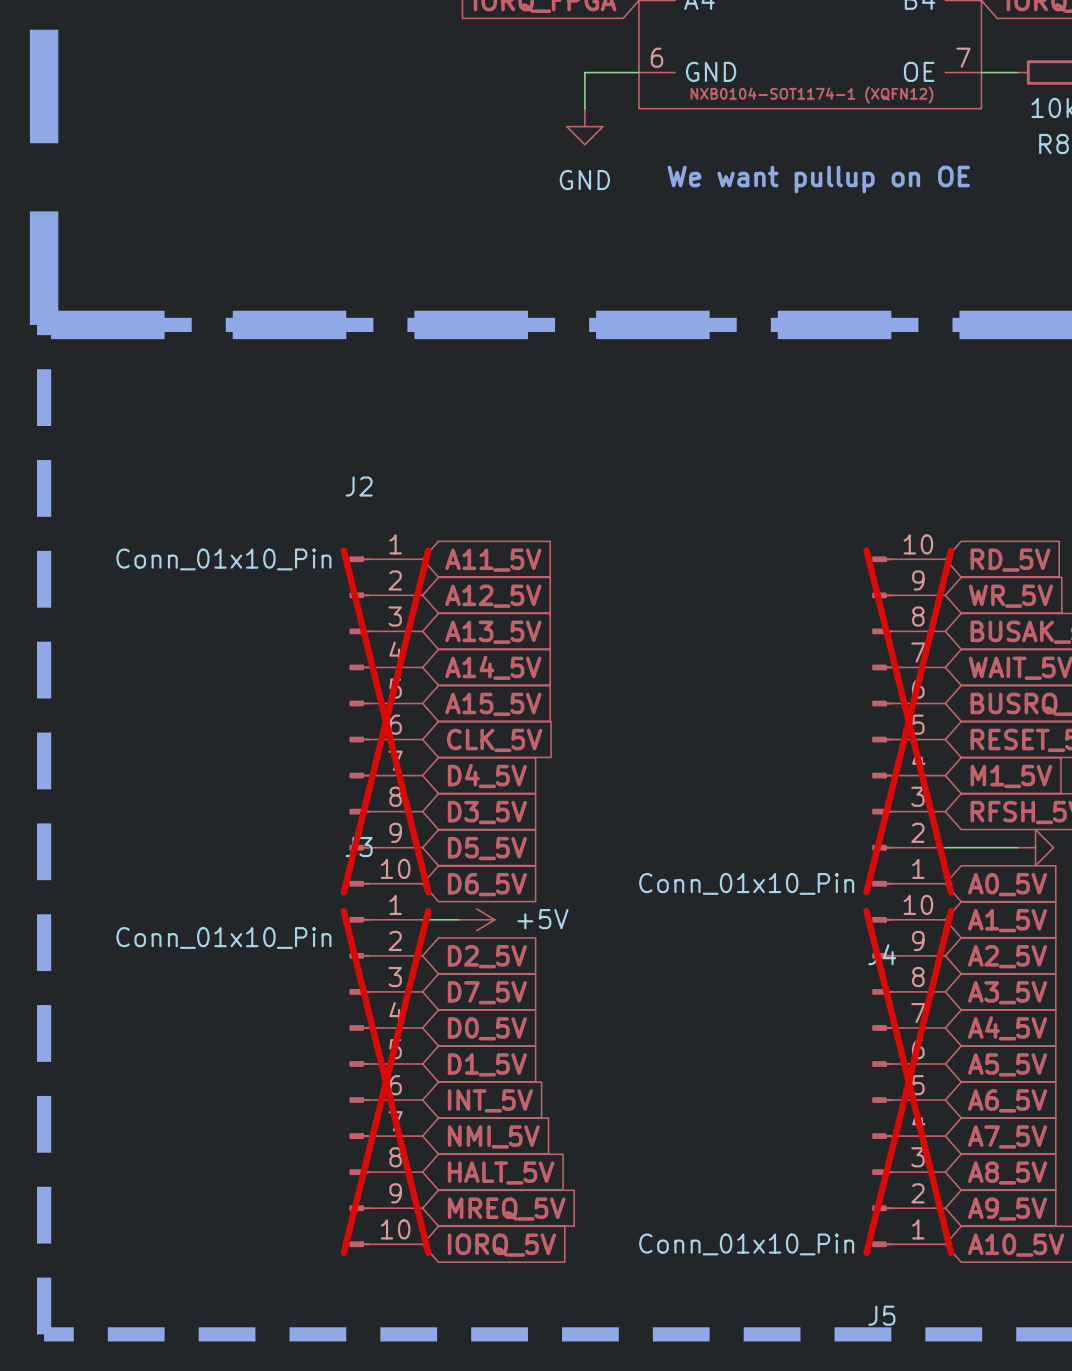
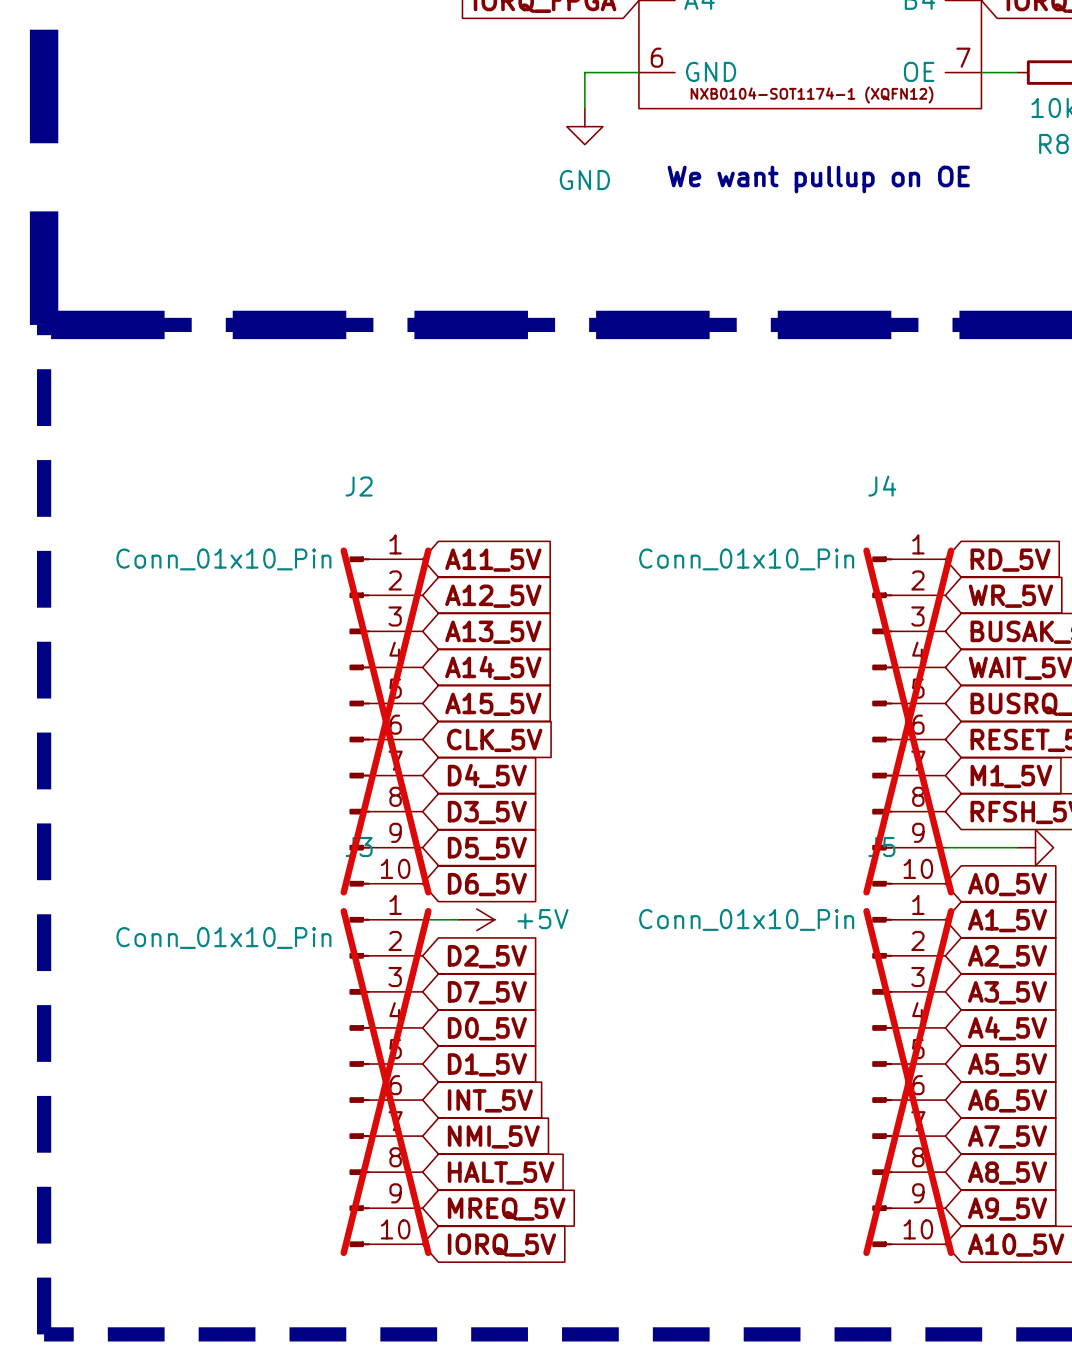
J4 flip: as is (882, 721) -> up-down (882, 721)
J5 flip: as is (882, 1082) -> up-down (882, 1082)

